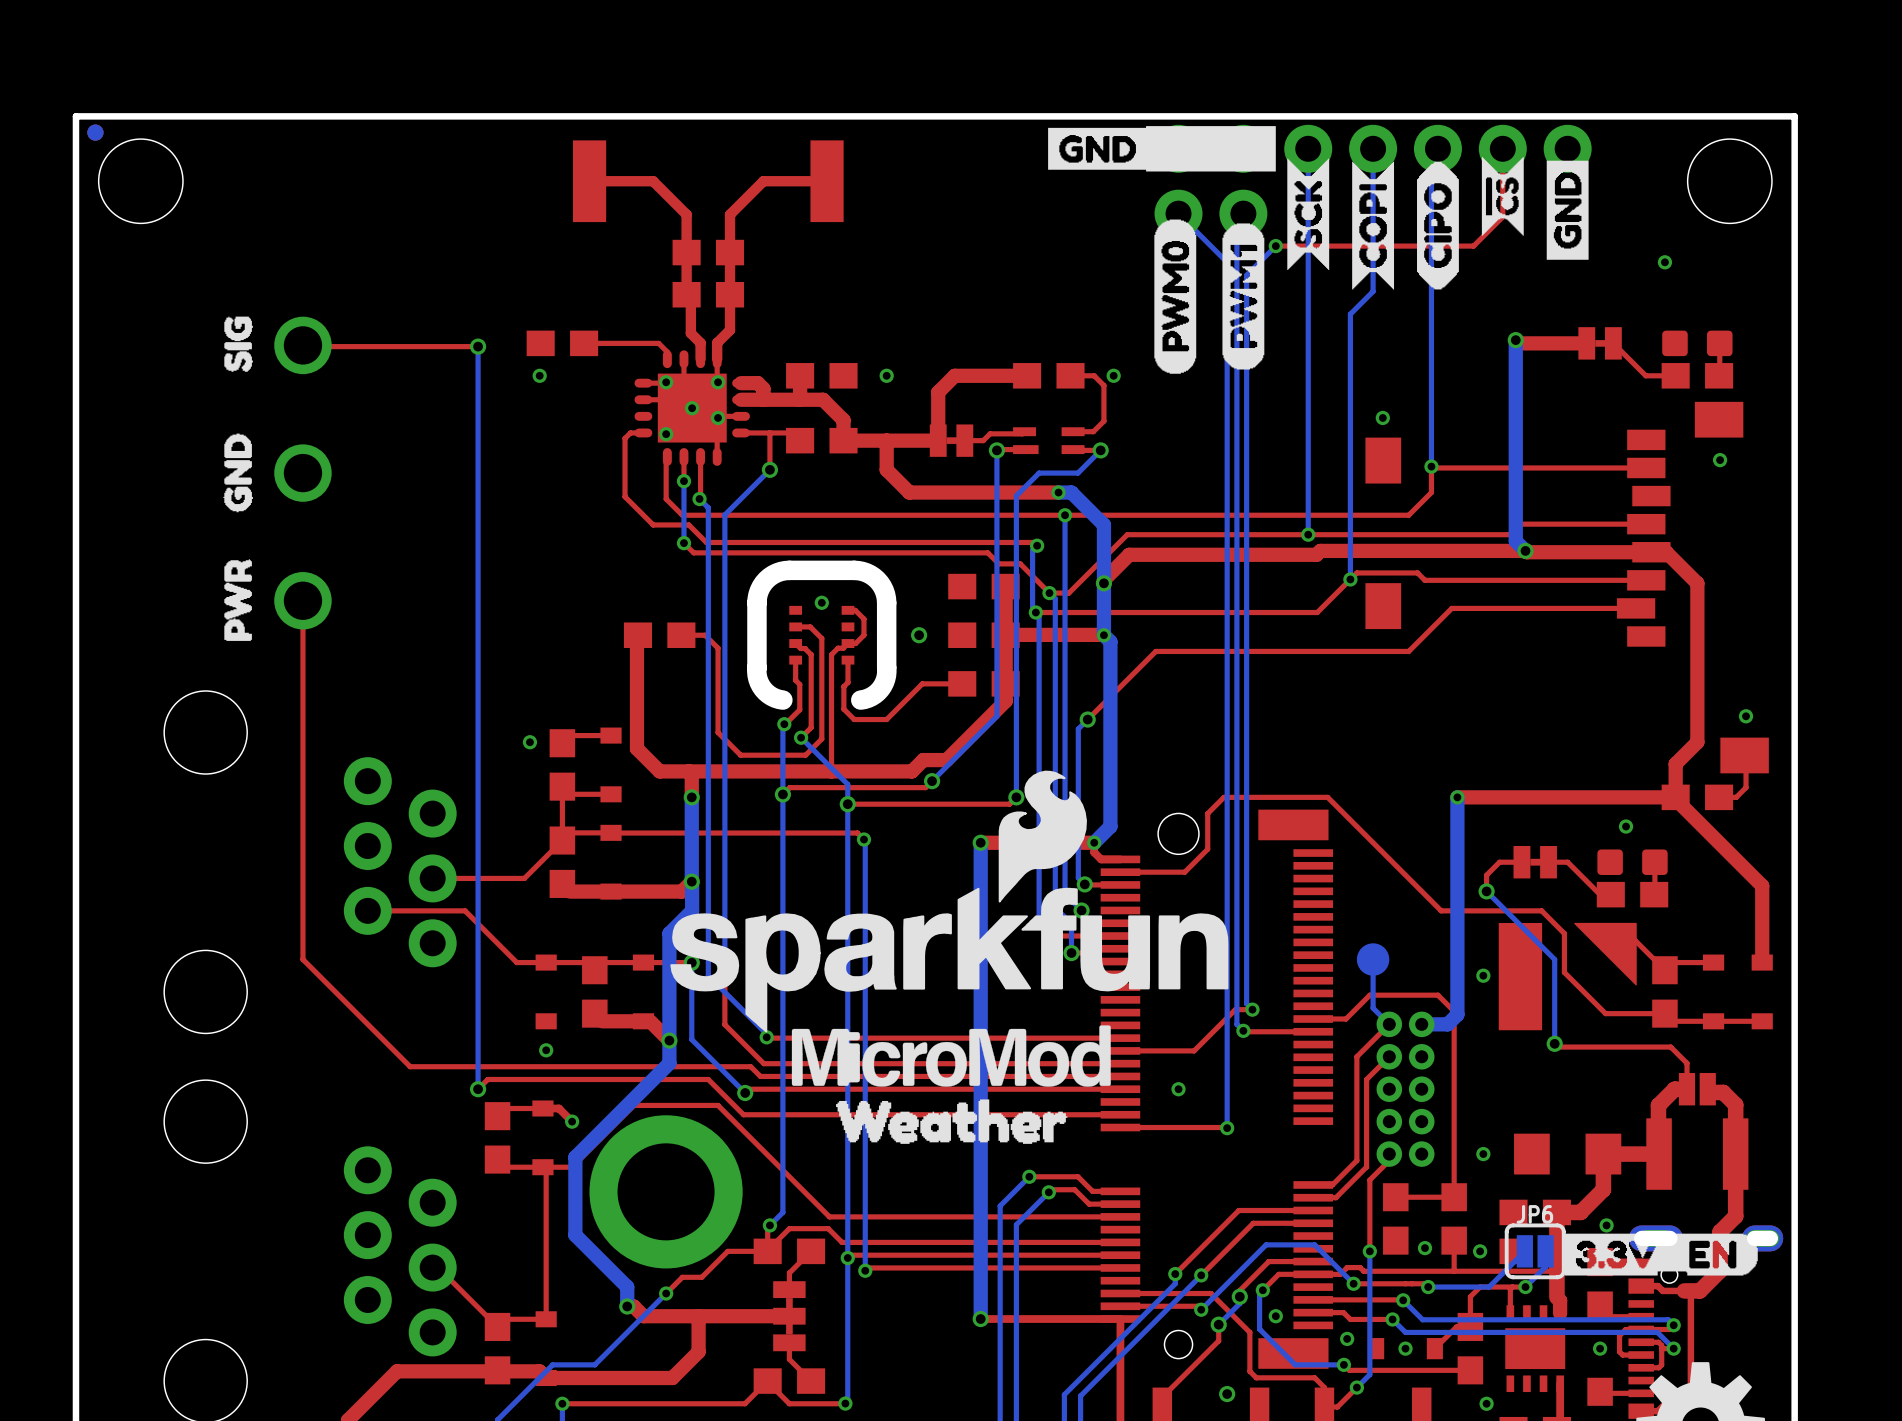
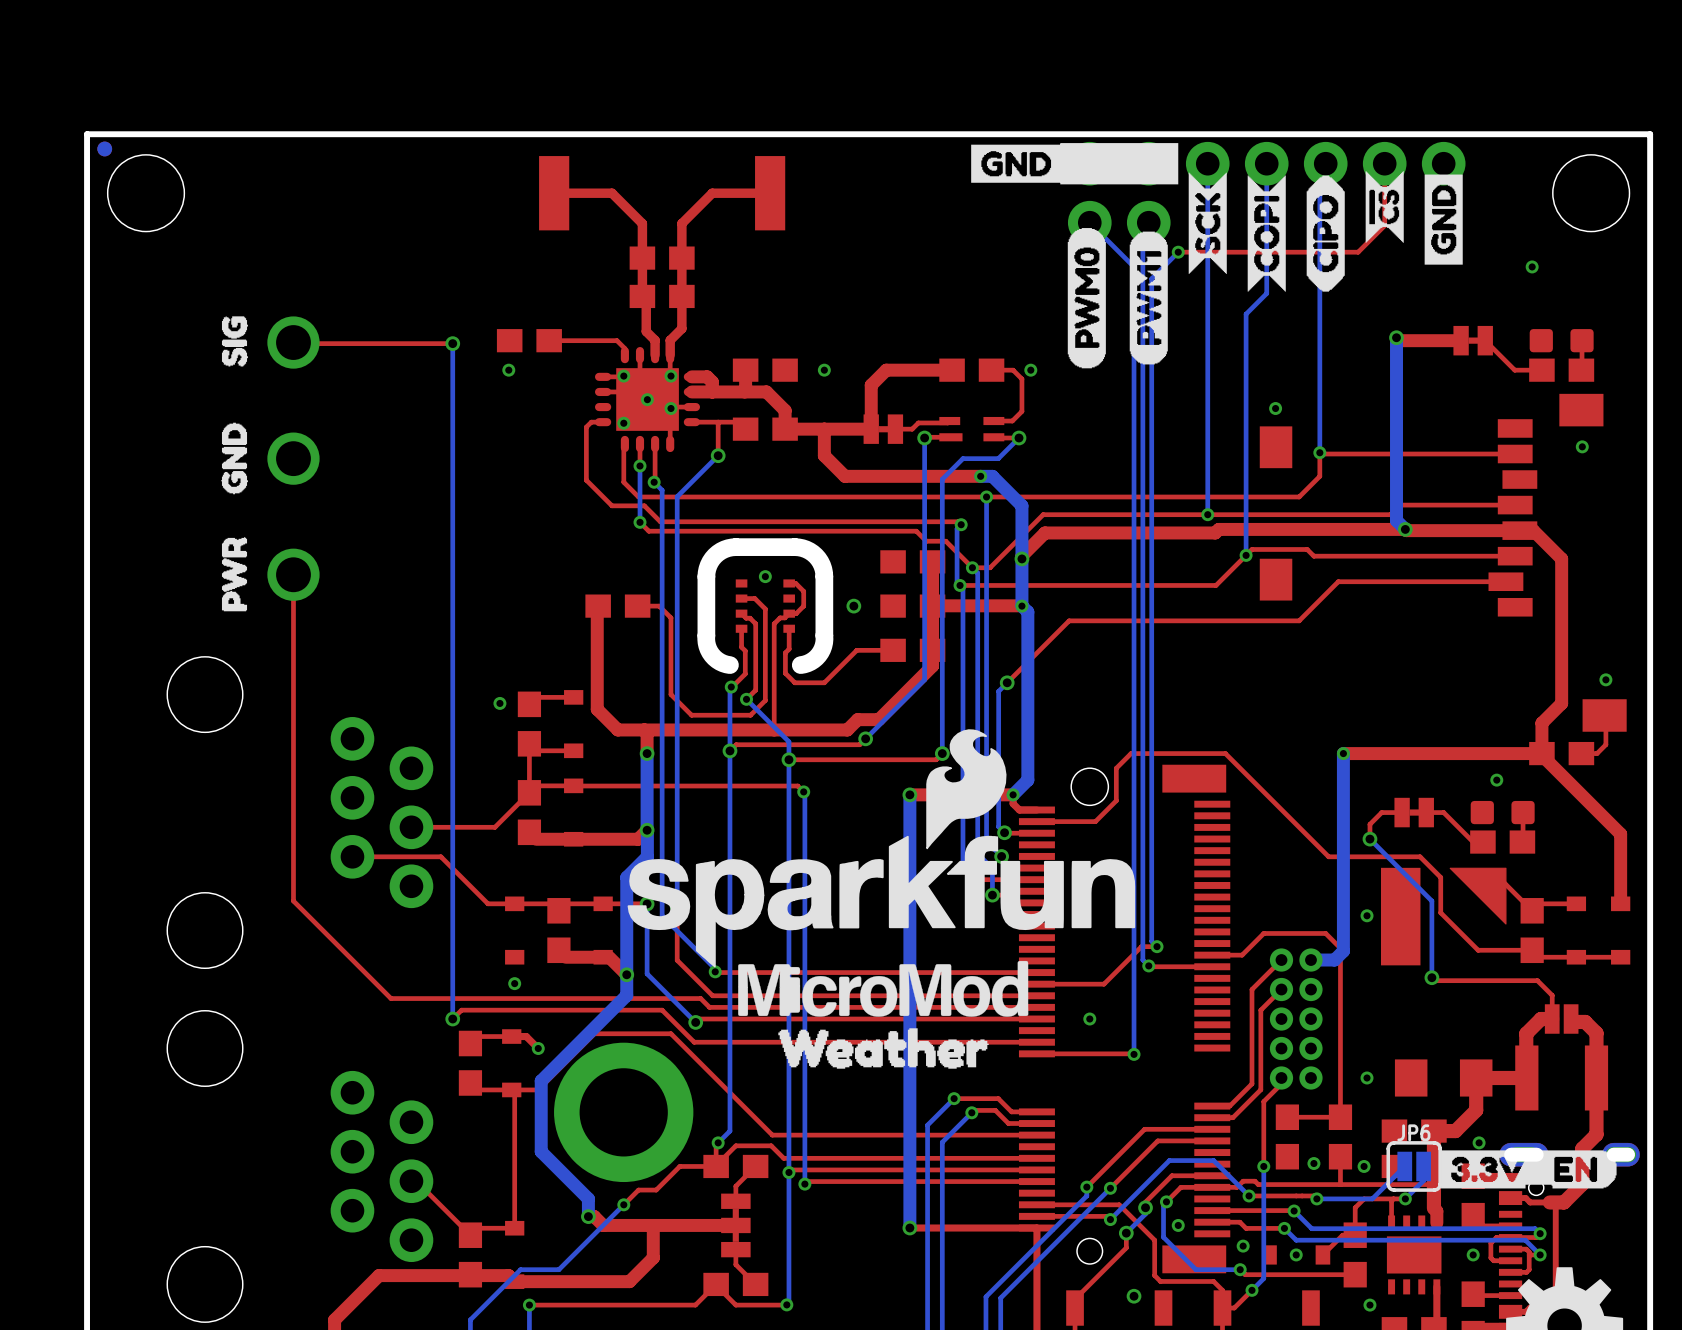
bottom track: (1373, 959) (1373, 1008) (1389, 1024) -> none
part: (1373, 959) -> none

